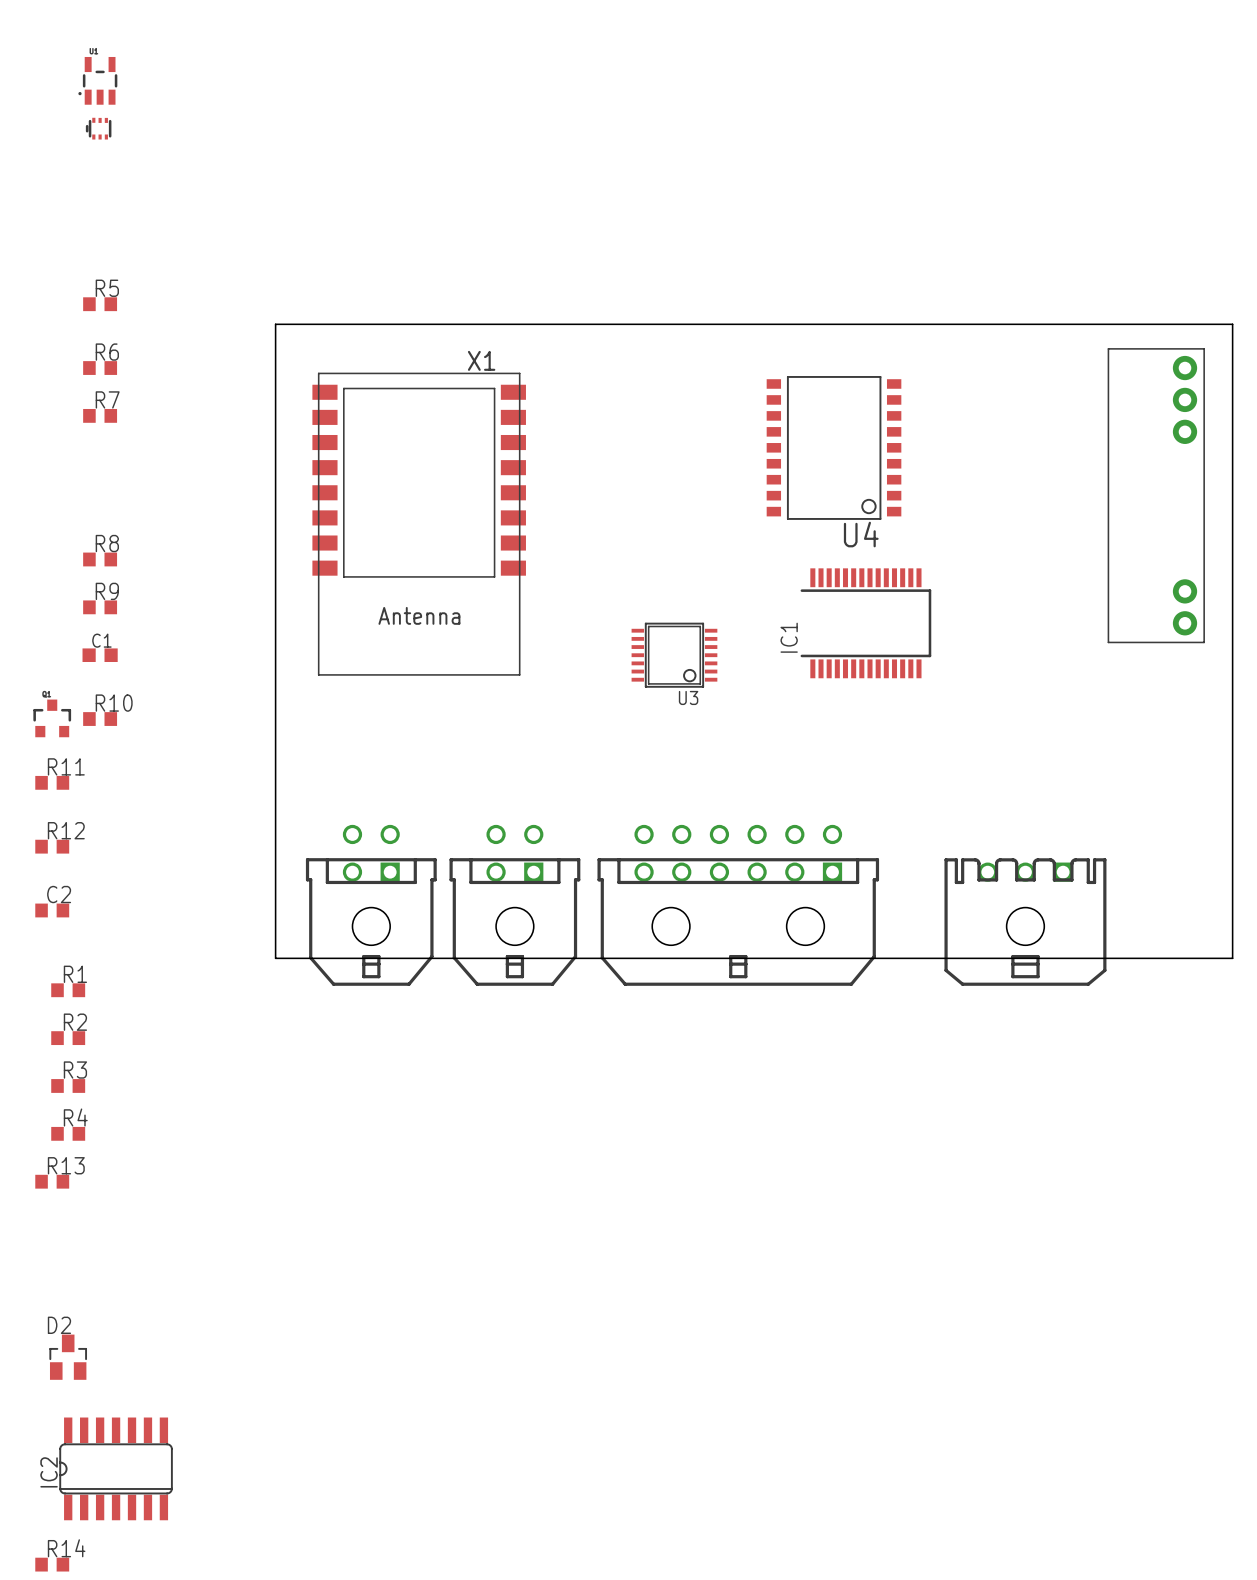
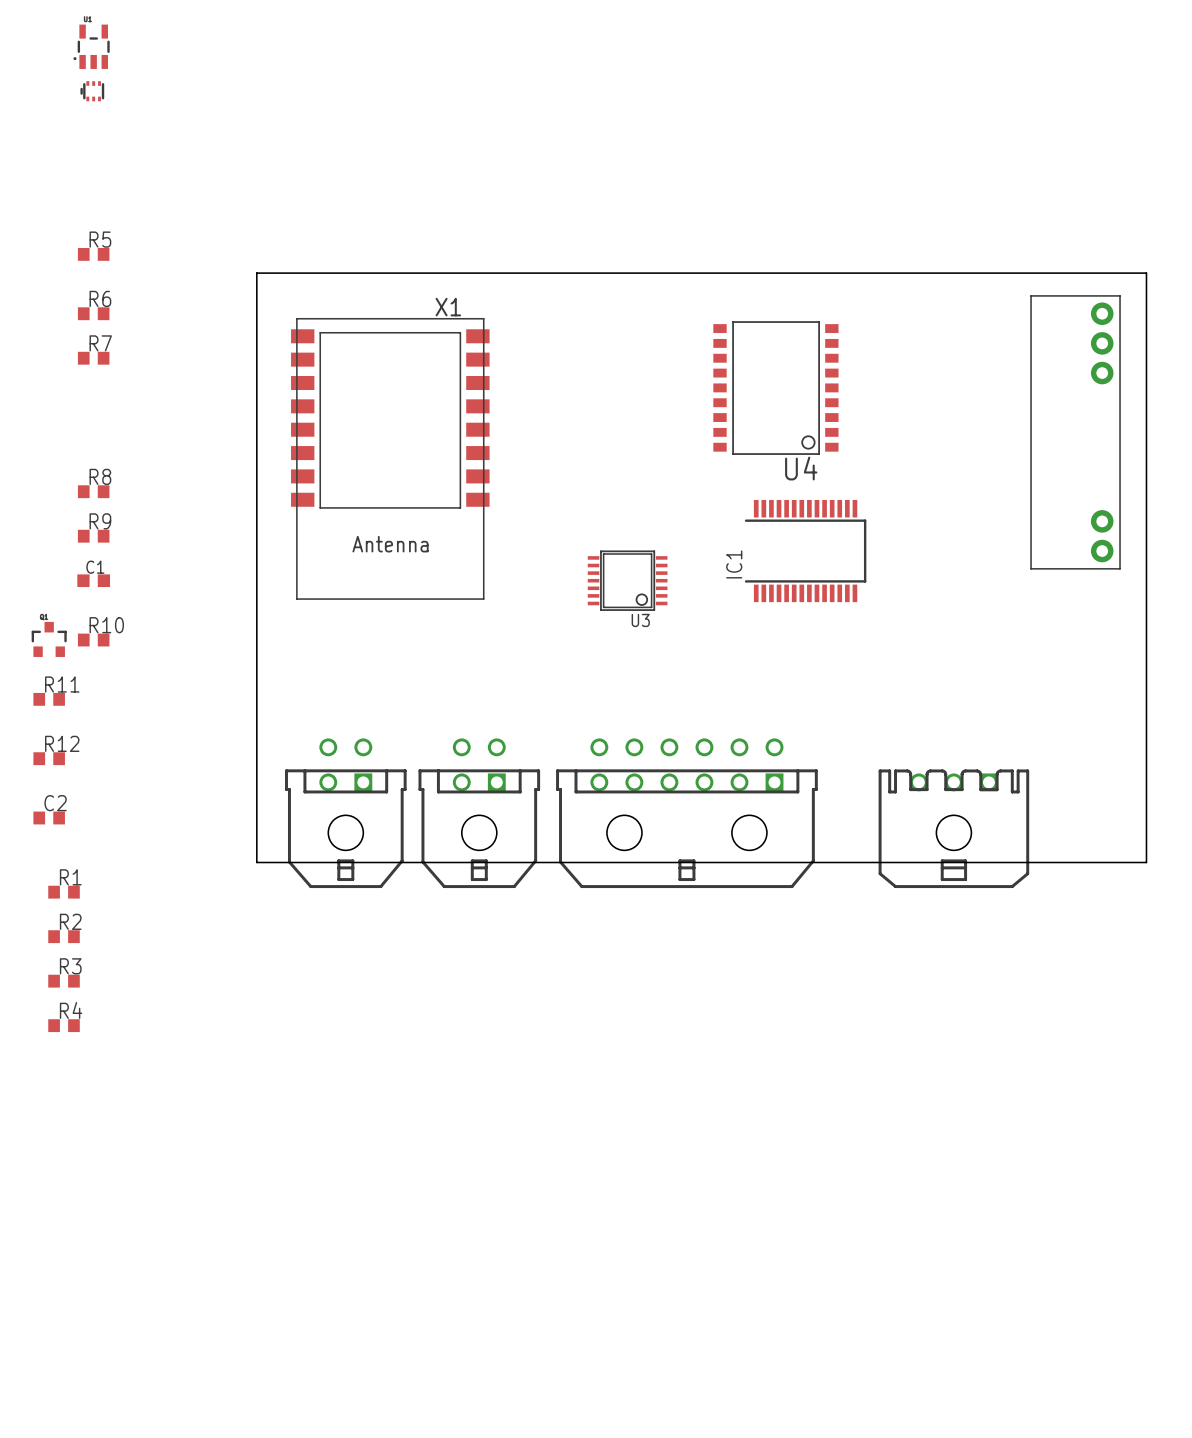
R13: (52, 1181) -> none
D2: (68, 1357) -> none
IC2: (116, 1468) -> none
R14: (52, 1564) -> none

